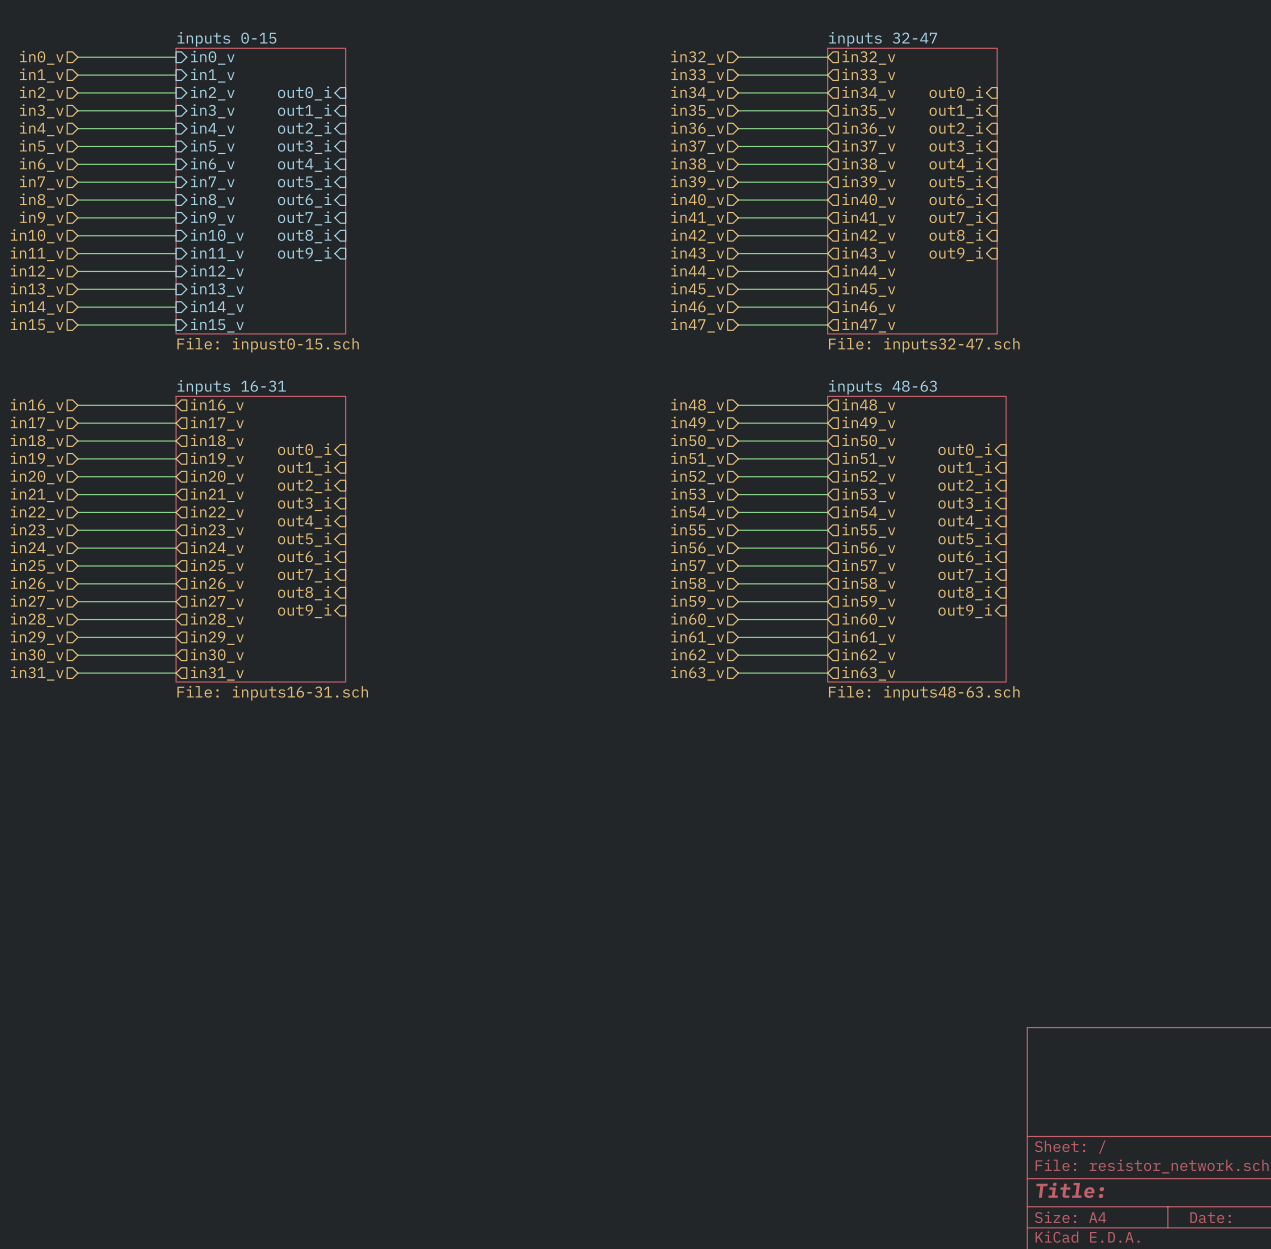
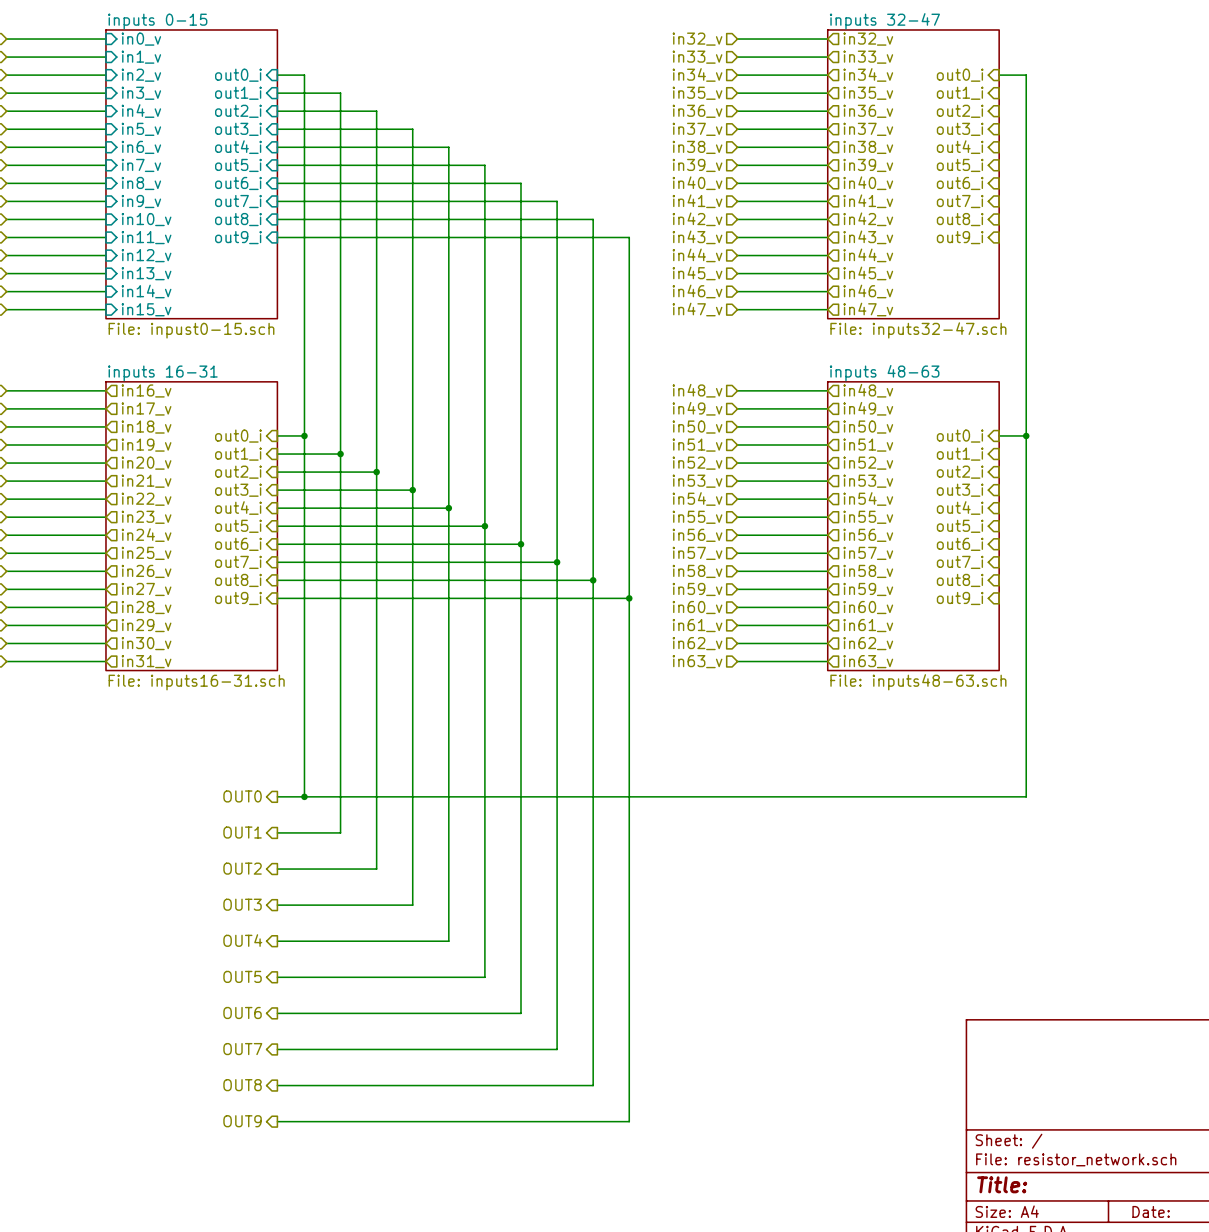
hierarchical label: in32_v (697, 57) -> none
wire: (738, 57) (800, 57) -> (764, 39) (827, 39)
hierarchical label: none -> in32_v (697, 39)
hierarchical label: in32_v (868, 57) -> none
hierarchical label: none -> in32_v (868, 39)
hierarchical label: in33_v (697, 75) -> none
wire: (738, 75) (800, 75) -> (764, 57) (827, 57)
hierarchical label: none -> in33_v (697, 57)
hierarchical label: in33_v (868, 75) -> none
hierarchical label: none -> in33_v (868, 57)
wire: none -> (277, 75) (304, 75) (304, 796)
wire: (738, 92) (800, 92) -> (764, 75) (827, 75)
wire: none -> (999, 75) (1026, 75) (1026, 796) (277, 796)
hierarchical label: in34_v (697, 93) -> none
hierarchical label: none -> in34_v (697, 74)
hierarchical label: in34_v (868, 93) -> none
hierarchical label: none -> in34_v (868, 74)
hierarchical label position: out0_i (956, 93) -> out0_i (960, 75)
wire: none -> (277, 93) (340, 93) (340, 832) (277, 832)
wire: (738, 110) (800, 110) -> (764, 93) (827, 93)
hierarchical label: in35_v (697, 111) -> none
hierarchical label: none -> in35_v (697, 93)
hierarchical label: in35_v (868, 111) -> none
hierarchical label: none -> in35_v (868, 93)
hierarchical label position: out1_i (956, 111) -> out1_i (960, 93)
wire: none -> (277, 111) (376, 111) (376, 869) (277, 869)
wire: (738, 128) (800, 128) -> (764, 111) (827, 111)
hierarchical label: in36_v (697, 129) -> none
hierarchical label: none -> in36_v (697, 111)
hierarchical label: in36_v (868, 129) -> none
hierarchical label: none -> in36_v (868, 111)
hierarchical label position: out2_i (956, 129) -> out2_i (960, 111)
wire: none -> (277, 129) (412, 129) (412, 905) (277, 905)
wire: (738, 146) (800, 146) -> (764, 129) (827, 129)
hierarchical label: in37_v (697, 147) -> none
hierarchical label: none -> in37_v (697, 129)
hierarchical label: in37_v (868, 147) -> none
hierarchical label: none -> in37_v (868, 129)
hierarchical label position: out3_i (956, 147) -> out3_i (960, 129)
wire: none -> (277, 147) (448, 147) (448, 941) (277, 941)
hierarchical label: in38_v (697, 164) -> none
wire: (738, 164) (800, 164) -> (764, 147) (827, 147)
hierarchical label: none -> in38_v (697, 147)
hierarchical label: in38_v (868, 164) -> none
hierarchical label: none -> in38_v (868, 147)
hierarchical label position: out4_i (956, 164) -> out4_i (960, 147)
wire: none -> (277, 165) (484, 165) (484, 977) (277, 977)
hierarchical label: in39_v (697, 182) -> none
wire: (738, 182) (800, 182) -> (764, 165) (827, 165)
hierarchical label: none -> in39_v (697, 165)
hierarchical label: in39_v (868, 182) -> none
hierarchical label: none -> in39_v (868, 165)
hierarchical label position: out5_i (956, 182) -> out5_i (960, 165)
sheet inputs 32-47 position: (912, 191) -> (913, 174)
wire: none -> (277, 183) (520, 183) (520, 1013) (277, 1013)
hierarchical label: in40_v (697, 200) -> none
wire: (738, 200) (800, 200) -> (764, 183) (827, 183)
hierarchical label: none -> in40_v (697, 183)
hierarchical label: in40_v (868, 200) -> none
hierarchical label: none -> in40_v (868, 183)
hierarchical label position: out6_i (956, 200) -> out6_i (960, 183)
wire: none -> (277, 201) (557, 201) (557, 1049) (277, 1049)
wire: (738, 217) (800, 217) -> (764, 201) (827, 201)
hierarchical label: in41_v (697, 218) -> none
hierarchical label: none -> in41_v (697, 201)
hierarchical label: in41_v (868, 218) -> none
hierarchical label: none -> in41_v (868, 201)
hierarchical label position: out7_i (956, 218) -> out7_i (960, 201)
wire: none -> (277, 219) (593, 219) (593, 1085) (277, 1085)
wire: (738, 235) (800, 235) -> (764, 219) (827, 219)
hierarchical label: in42_v (697, 236) -> none
hierarchical label: none -> in42_v (697, 219)
hierarchical label: in42_v (868, 236) -> none
hierarchical label: none -> in42_v (868, 219)
hierarchical label position: out8_i (956, 236) -> out8_i (960, 219)
wire: none -> (277, 237) (629, 237) (629, 1121) (277, 1121)
wire: (738, 253) (800, 253) -> (764, 237) (827, 237)
hierarchical label: in43_v (697, 254) -> none
hierarchical label: none -> in43_v (697, 237)
hierarchical label: in43_v (868, 254) -> none
hierarchical label: none -> in43_v (868, 237)
hierarchical label position: out9_i (956, 254) -> out9_i (960, 237)
hierarchical label: in44_v (697, 271) -> none
wire: (738, 271) (800, 271) -> (764, 255) (827, 255)
hierarchical label: none -> in44_v (697, 255)
hierarchical label: in44_v (868, 271) -> none
hierarchical label: none -> in44_v (868, 255)
hierarchical label: in45_v (697, 289) -> none
wire: (738, 289) (800, 289) -> (764, 273) (827, 273)
hierarchical label: none -> in45_v (697, 273)
hierarchical label: in45_v (868, 289) -> none
hierarchical label: none -> in45_v (868, 273)
hierarchical label: in46_v (697, 307) -> none
wire: (738, 307) (800, 307) -> (764, 291) (827, 291)
hierarchical label: none -> in46_v (697, 291)
hierarchical label: in46_v (868, 307) -> none
hierarchical label: none -> in46_v (868, 291)
hierarchical label: in47_v (697, 325) -> none
wire: (738, 325) (800, 325) -> (764, 309) (827, 309)
hierarchical label: none -> in47_v (697, 309)
hierarchical label: in47_v (868, 325) -> none
hierarchical label: none -> in47_v (868, 309)
sheet inputs 48-63 shape: [827, 396, 1007, 683] -> [827, 381, 1000, 671]
hierarchical label: in48_v (697, 405) -> none
wire: (738, 405) (800, 405) -> (764, 390) (827, 390)
hierarchical label: none -> in48_v (697, 390)
hierarchical label: in48_v (868, 405) -> none
hierarchical label: none -> in48_v (868, 390)
hierarchical label: in49_v (697, 423) -> none
wire: (738, 423) (800, 423) -> (764, 408) (827, 408)
hierarchical label: none -> in49_v (697, 408)
hierarchical label: in49_v (868, 423) -> none
hierarchical label: none -> in49_v (868, 408)
hierarchical label: in50_v (697, 441) -> none
wire: (738, 441) (800, 441) -> (764, 426) (827, 426)
hierarchical label: none -> in50_v (697, 427)
hierarchical label: in50_v (868, 441) -> none
hierarchical label: none -> in50_v (868, 427)
wire: none -> (277, 435) (304, 435)
junction: none -> (304, 435)
wire: none -> (999, 435) (1026, 435)
junction: none -> (1026, 435)
hierarchical label position: out0_i (965, 450) -> out0_i (960, 436)
wire: (738, 458) (800, 458) -> (764, 445) (827, 445)
hierarchical label: in51_v (697, 459) -> none
hierarchical label: none -> in51_v (697, 445)
hierarchical label: in51_v (868, 459) -> none
hierarchical label: none -> in51_v (868, 445)
wire: none -> (277, 454) (340, 454)
junction: none -> (340, 454)
hierarchical label position: out1_i (965, 468) -> out1_i (960, 454)
wire: (738, 476) (800, 476) -> (764, 463) (827, 463)
hierarchical label: in52_v (697, 477) -> none
hierarchical label: none -> in52_v (697, 463)
hierarchical label: in52_v (868, 477) -> none
hierarchical label: none -> in52_v (868, 463)
wire: none -> (277, 472) (376, 472)
junction: none -> (376, 472)
hierarchical label position: out2_i (965, 486) -> out2_i (960, 472)
wire: (738, 494) (800, 494) -> (764, 481) (827, 481)
hierarchical label: in53_v (697, 495) -> none
hierarchical label: none -> in53_v (697, 481)
hierarchical label: in53_v (868, 495) -> none
hierarchical label: none -> in53_v (868, 481)
wire: none -> (277, 490) (412, 490)
junction: none -> (412, 490)
hierarchical label position: out3_i (965, 504) -> out3_i (960, 490)
hierarchical label: in54_v (697, 512) -> none
wire: (738, 512) (800, 512) -> (764, 499) (827, 499)
hierarchical label: none -> in54_v (697, 498)
hierarchical label: in54_v (868, 512) -> none
hierarchical label: none -> in54_v (868, 498)
wire: none -> (277, 508) (448, 508)
junction: none -> (448, 508)
hierarchical label position: out4_i (965, 521) -> out4_i (960, 508)
hierarchical label: in55_v (697, 530) -> none
wire: (738, 530) (800, 530) -> (764, 517) (827, 517)
hierarchical label: none -> in55_v (697, 517)
hierarchical label: in55_v (868, 530) -> none
hierarchical label: none -> in55_v (868, 517)
wire: none -> (277, 526) (484, 526)
junction: none -> (484, 526)
hierarchical label position: out5_i (965, 539) -> out5_i (960, 526)
hierarchical label: in56_v (697, 548) -> none
wire: (738, 548) (800, 548) -> (764, 535) (827, 535)
hierarchical label: none -> in56_v (697, 535)
hierarchical label: in56_v (868, 548) -> none
hierarchical label: none -> in56_v (868, 535)
wire: none -> (277, 544) (520, 544)
junction: none -> (520, 544)
hierarchical label position: out6_i (965, 557) -> out6_i (960, 544)
wire: (738, 565) (800, 565) -> (764, 553) (827, 553)
hierarchical label: in57_v (697, 566) -> none
hierarchical label: none -> in57_v (697, 553)
hierarchical label: in57_v (868, 566) -> none
hierarchical label: none -> in57_v (868, 553)
wire: none -> (277, 562) (557, 562)
junction: none -> (557, 562)
hierarchical label position: out7_i (965, 575) -> out7_i (960, 562)
wire: (738, 583) (800, 583) -> (764, 571) (827, 571)
hierarchical label: in58_v (697, 584) -> none
hierarchical label: none -> in58_v (697, 571)
hierarchical label: in58_v (868, 584) -> none
hierarchical label: none -> in58_v (868, 571)
wire: none -> (277, 580) (593, 580)
junction: none -> (593, 580)
hierarchical label position: out8_i (965, 593) -> out8_i (960, 580)
wire: (738, 601) (800, 601) -> (764, 589) (827, 589)
hierarchical label: in59_v (697, 602) -> none
hierarchical label: none -> in59_v (697, 589)
hierarchical label: in59_v (868, 602) -> none
hierarchical label: none -> in59_v (868, 589)
wire: none -> (277, 598) (629, 598)
junction: none -> (629, 598)
hierarchical label position: out9_i (965, 611) -> out9_i (960, 598)
wire: (738, 619) (800, 619) -> (764, 607) (827, 607)
hierarchical label: in60_v (697, 620) -> none
hierarchical label: none -> in60_v (697, 607)
hierarchical label: in60_v (868, 620) -> none
hierarchical label: none -> in60_v (868, 607)
hierarchical label: in61_v (697, 637) -> none
wire: (738, 637) (800, 637) -> (764, 625) (827, 625)
hierarchical label: none -> in61_v (697, 625)
hierarchical label: in61_v (868, 637) -> none
hierarchical label: none -> in61_v (868, 625)
hierarchical label: in62_v (697, 655) -> none
wire: (738, 655) (800, 655) -> (764, 643) (827, 643)
hierarchical label: none -> in62_v (697, 643)
hierarchical label: in62_v (868, 655) -> none
hierarchical label: none -> in62_v (868, 643)
hierarchical label: in63_v (697, 673) -> none
wire: (738, 673) (800, 673) -> (764, 661) (827, 661)
hierarchical label: none -> in63_v (697, 661)
hierarchical label: in63_v (868, 673) -> none
hierarchical label: none -> in63_v (868, 661)
hierarchical label: none -> OUT0 (242, 796)
junction: none -> (304, 796)
hierarchical label: none -> OUT1 (242, 832)
hierarchical label: none -> OUT2 (242, 868)
hierarchical label: none -> OUT3 (242, 904)
hierarchical label: none -> OUT4 (242, 940)
hierarchical label: none -> OUT5 (242, 976)
hierarchical label: none -> OUT6 (242, 1012)
hierarchical label: none -> OUT7 (242, 1049)
hierarchical label: none -> OUT8 (242, 1085)
hierarchical label: none -> OUT9 (242, 1121)

